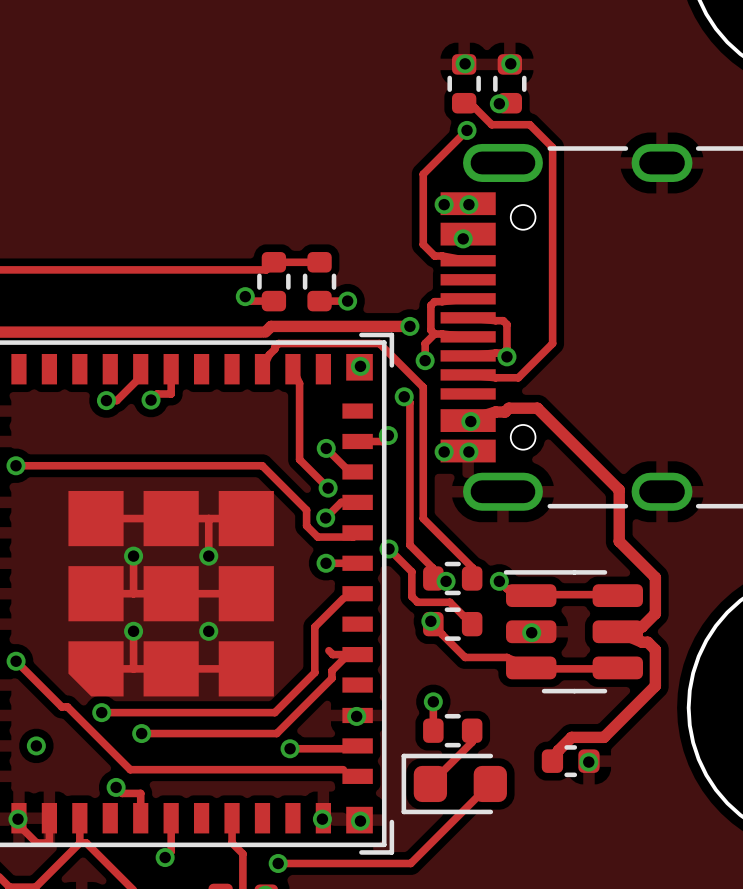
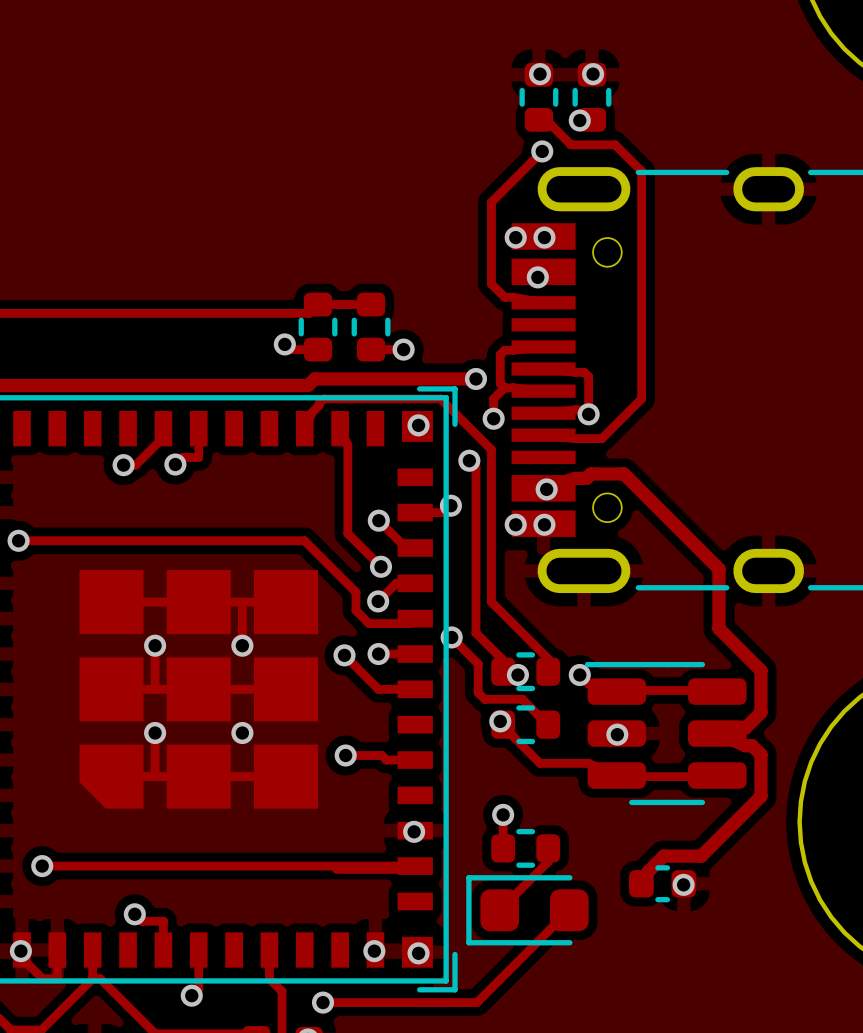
track: none -> (344, 655) (378, 689) (415, 689)
via: none -> (344, 655)
track: (343, 598) (314, 627) (314, 672) (274, 712) (101, 712) -> none
track: none -> (345, 755) (381, 755)
via: none -> (345, 755)
track: (343, 659) (331, 670) (331, 678) (276, 733) (141, 733) -> none
track: (16, 661) (61, 706) (67, 706) (130, 769) (343, 769) -> none
via: (16, 661) -> none
via: (101, 712) -> none
via: (141, 733) -> none
track: none -> (42, 866) (415, 866)
via: (290, 748) -> none

